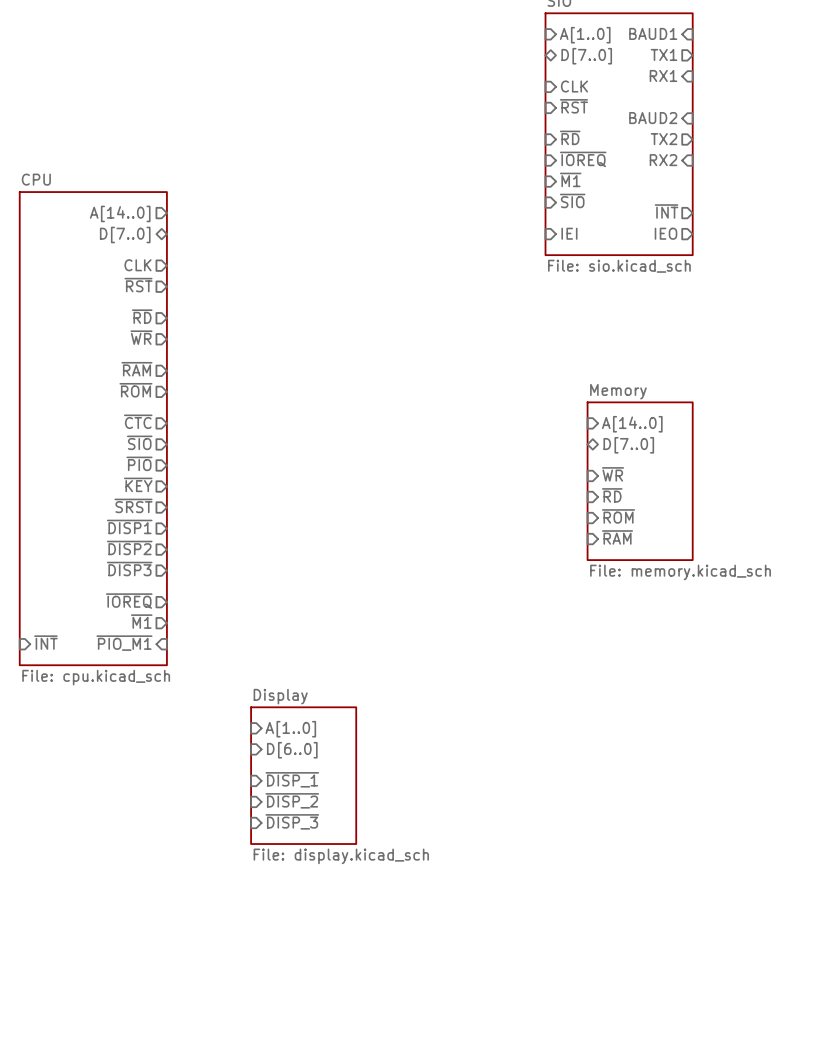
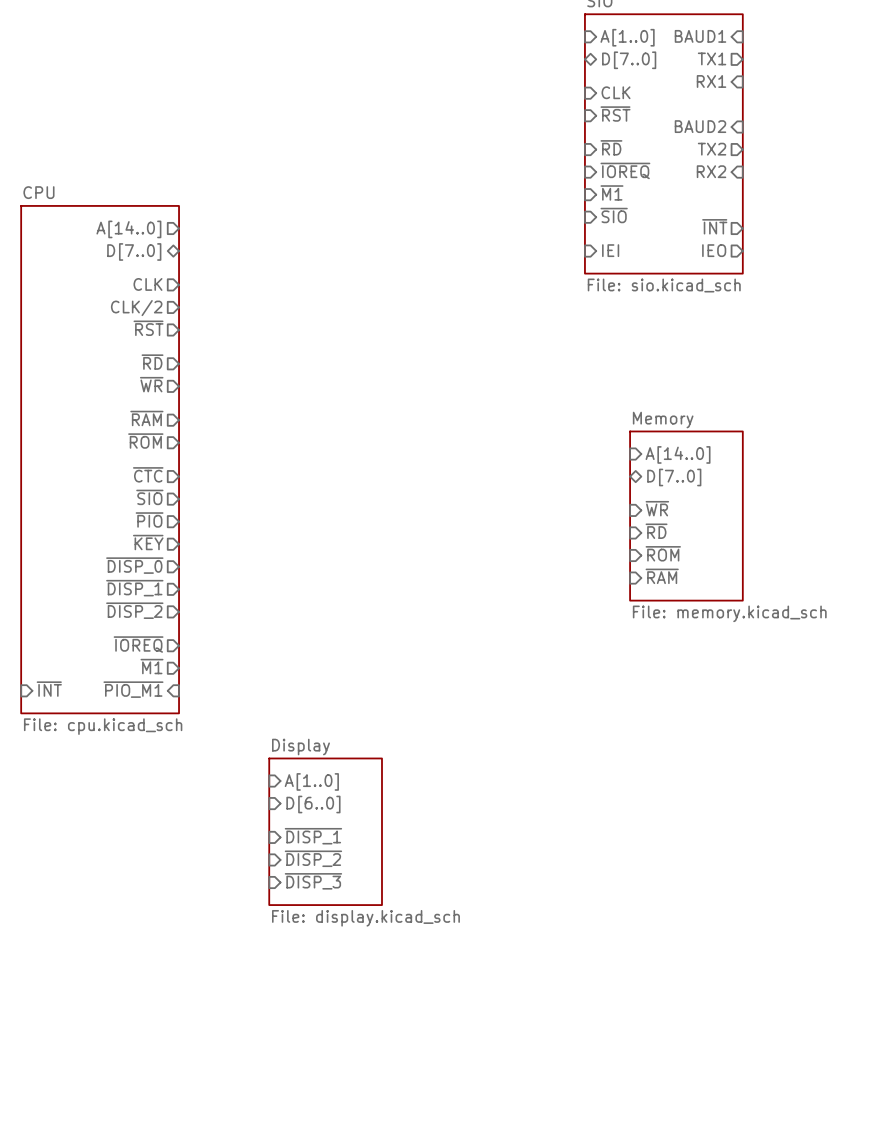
sheet pin: ~{RST} (138, 285) -> CLK/2 (136, 308)
sheet pin: ~{RD} (142, 316) -> ~{RST} (148, 328)
sheet pin: ~{WR} (141, 337) -> ~{RD} (152, 362)
sheet pin: ~{RAM} (136, 369) -> ~{WR} (151, 384)
sheet pin: ~{ROM} (135, 390) -> ~{RAM} (146, 418)
sheet pin: none -> ~{ROM} (145, 441)
sheet pin: ~{CTC} (138, 421) -> none
sheet pin: ~{SIO} (139, 442) -> ~{CTC} (148, 474)
sheet pin: ~{PIO} (139, 463) -> ~{SIO} (149, 497)
sheet pin: ~{KEY} (138, 484) -> ~{PIO} (149, 519)
sheet pin: ~{SRST} (133, 505) -> ~{KEY} (148, 542)
sheet pin: ~{DISP1} (129, 526) -> ~{DISP_0} (134, 565)
sheet pin: ~{DISP2} (129, 547) -> ~{DISP_1} (134, 588)
sheet pin: ~{DISP3} (129, 569) -> ~{DISP_2} (134, 610)

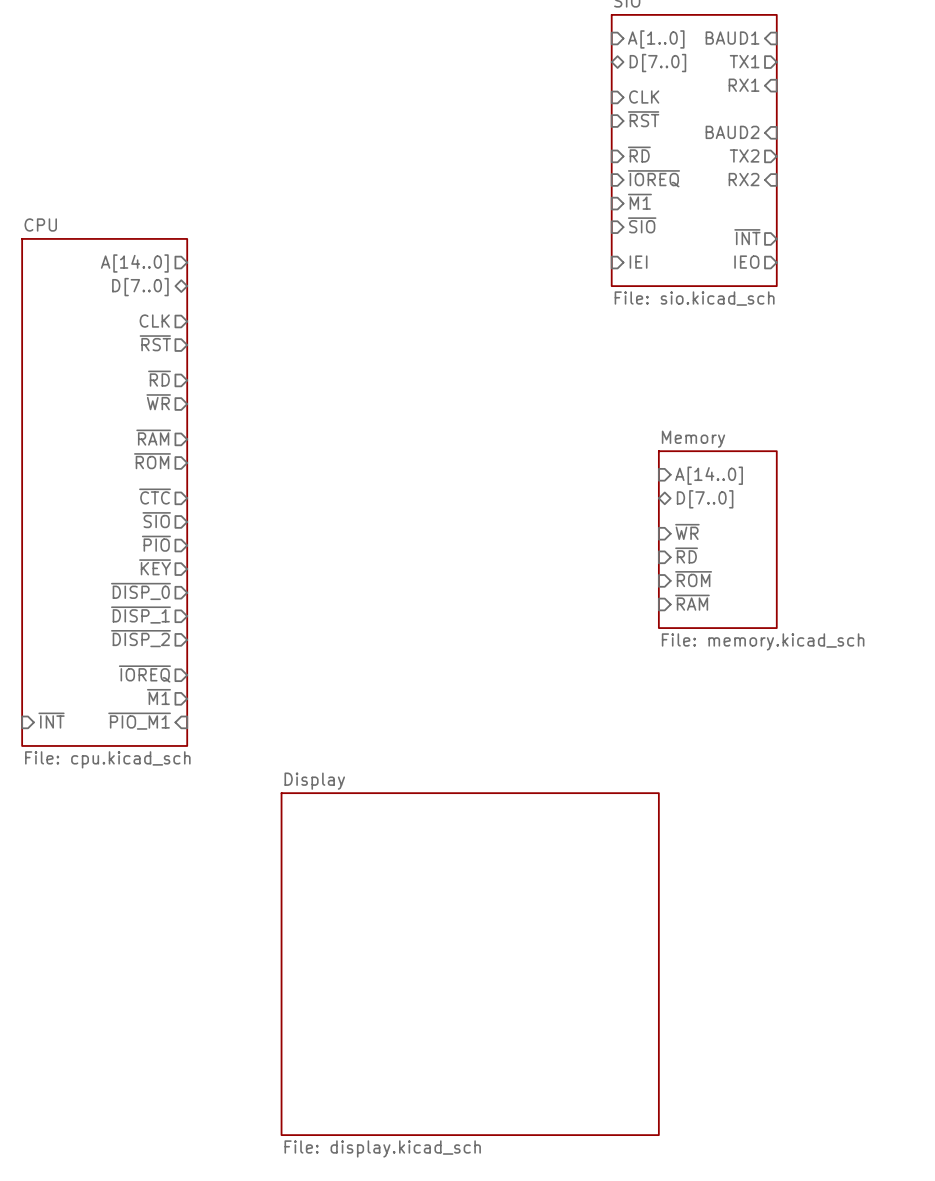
sheet pin: A[14..0] (128, 229) -> none
sheet pin shape: bidirectional (134, 251) -> output (134, 263)
sheet pin: D[7..0] (134, 251) -> A[14..0] (134, 263)
sheet pin: none -> D[7..0] (140, 287)
sheet pin: CLK (147, 284) -> none
sheet pin: CLK/2 (136, 308) -> CLK (154, 321)
sheet CPU: File: cpu.kicad_sch (100, 459) -> none
sheet CPU: none -> File: cpu.kicad_sch (104, 492)
sheet pin: A[1..0] (311, 781) -> none
sheet pin: D[6..0] (313, 804) -> none
sheet Display: File: display.kicad_sch (325, 831) -> none
sheet pin: ~{DISP_1} (313, 836) -> none
sheet pin: ~{DISP_2} (313, 858) -> none
sheet pin: ~{DISP_3} (313, 881) -> none
sheet Display: none -> File: display.kicad_sch (470, 964)

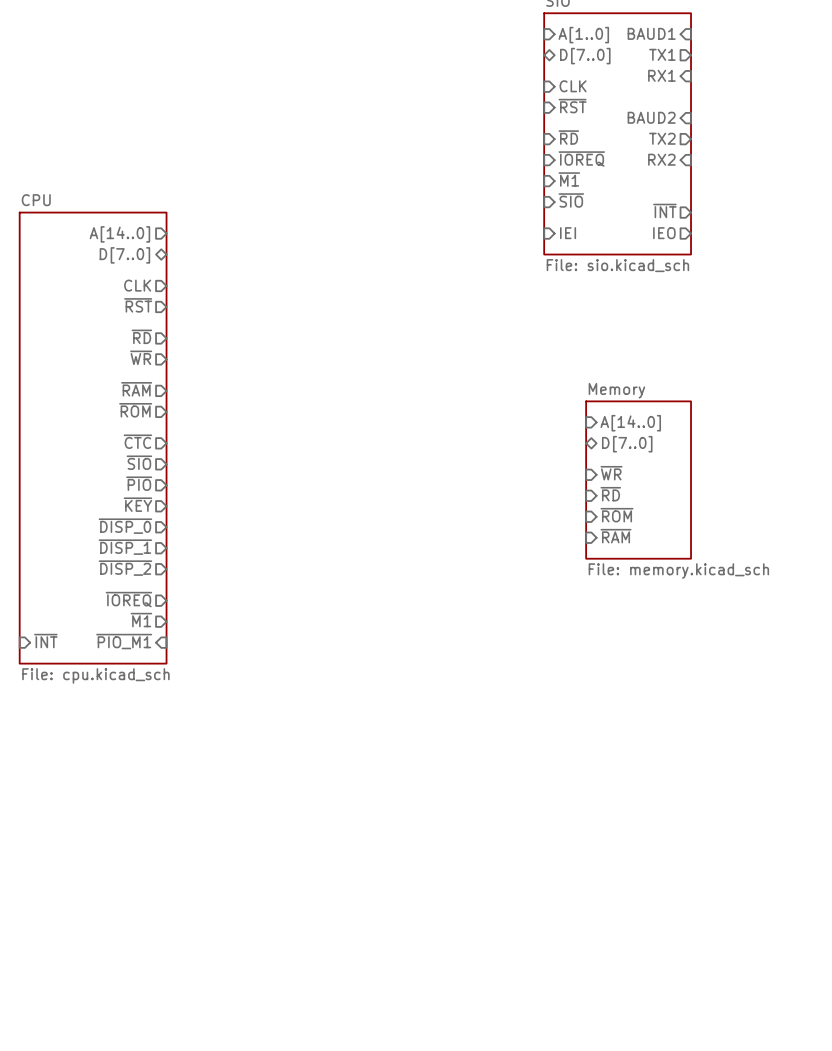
sheet Display: File: display.kicad_sch (470, 964) -> none

